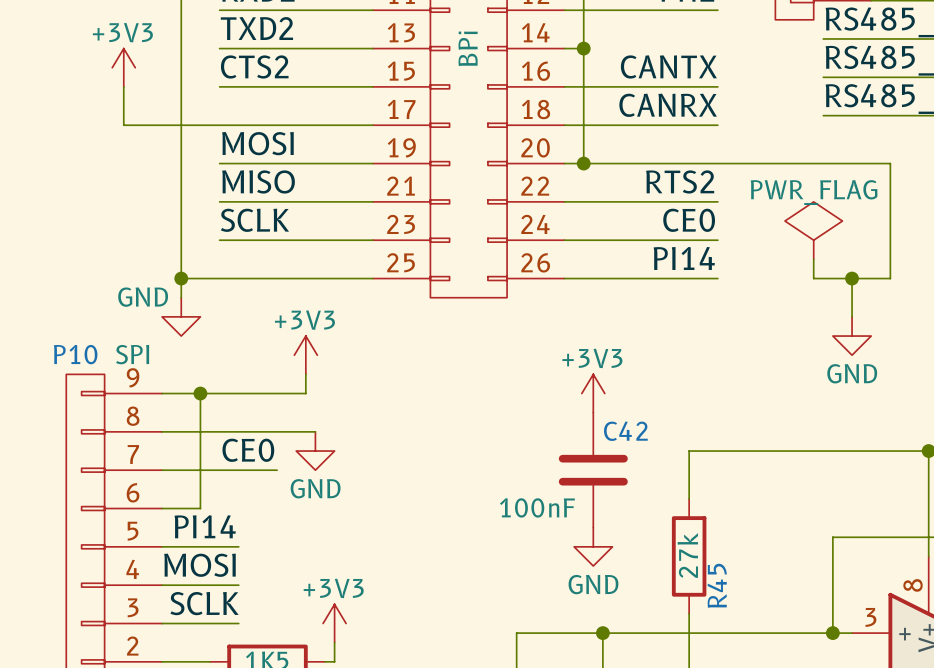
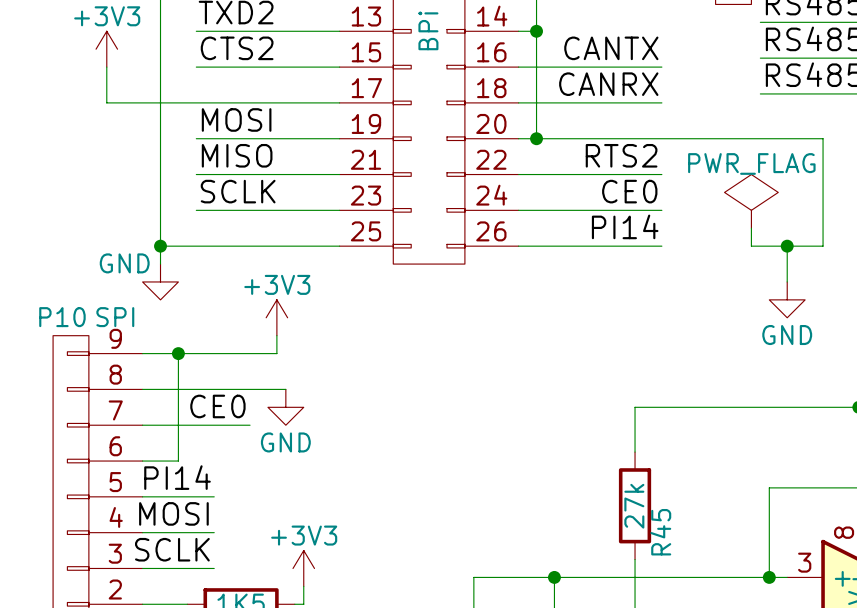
power symbol: +3V3 (593, 393) -> none
C42: 100nF (593, 470) -> none
power symbol: GND (593, 546) -> none

